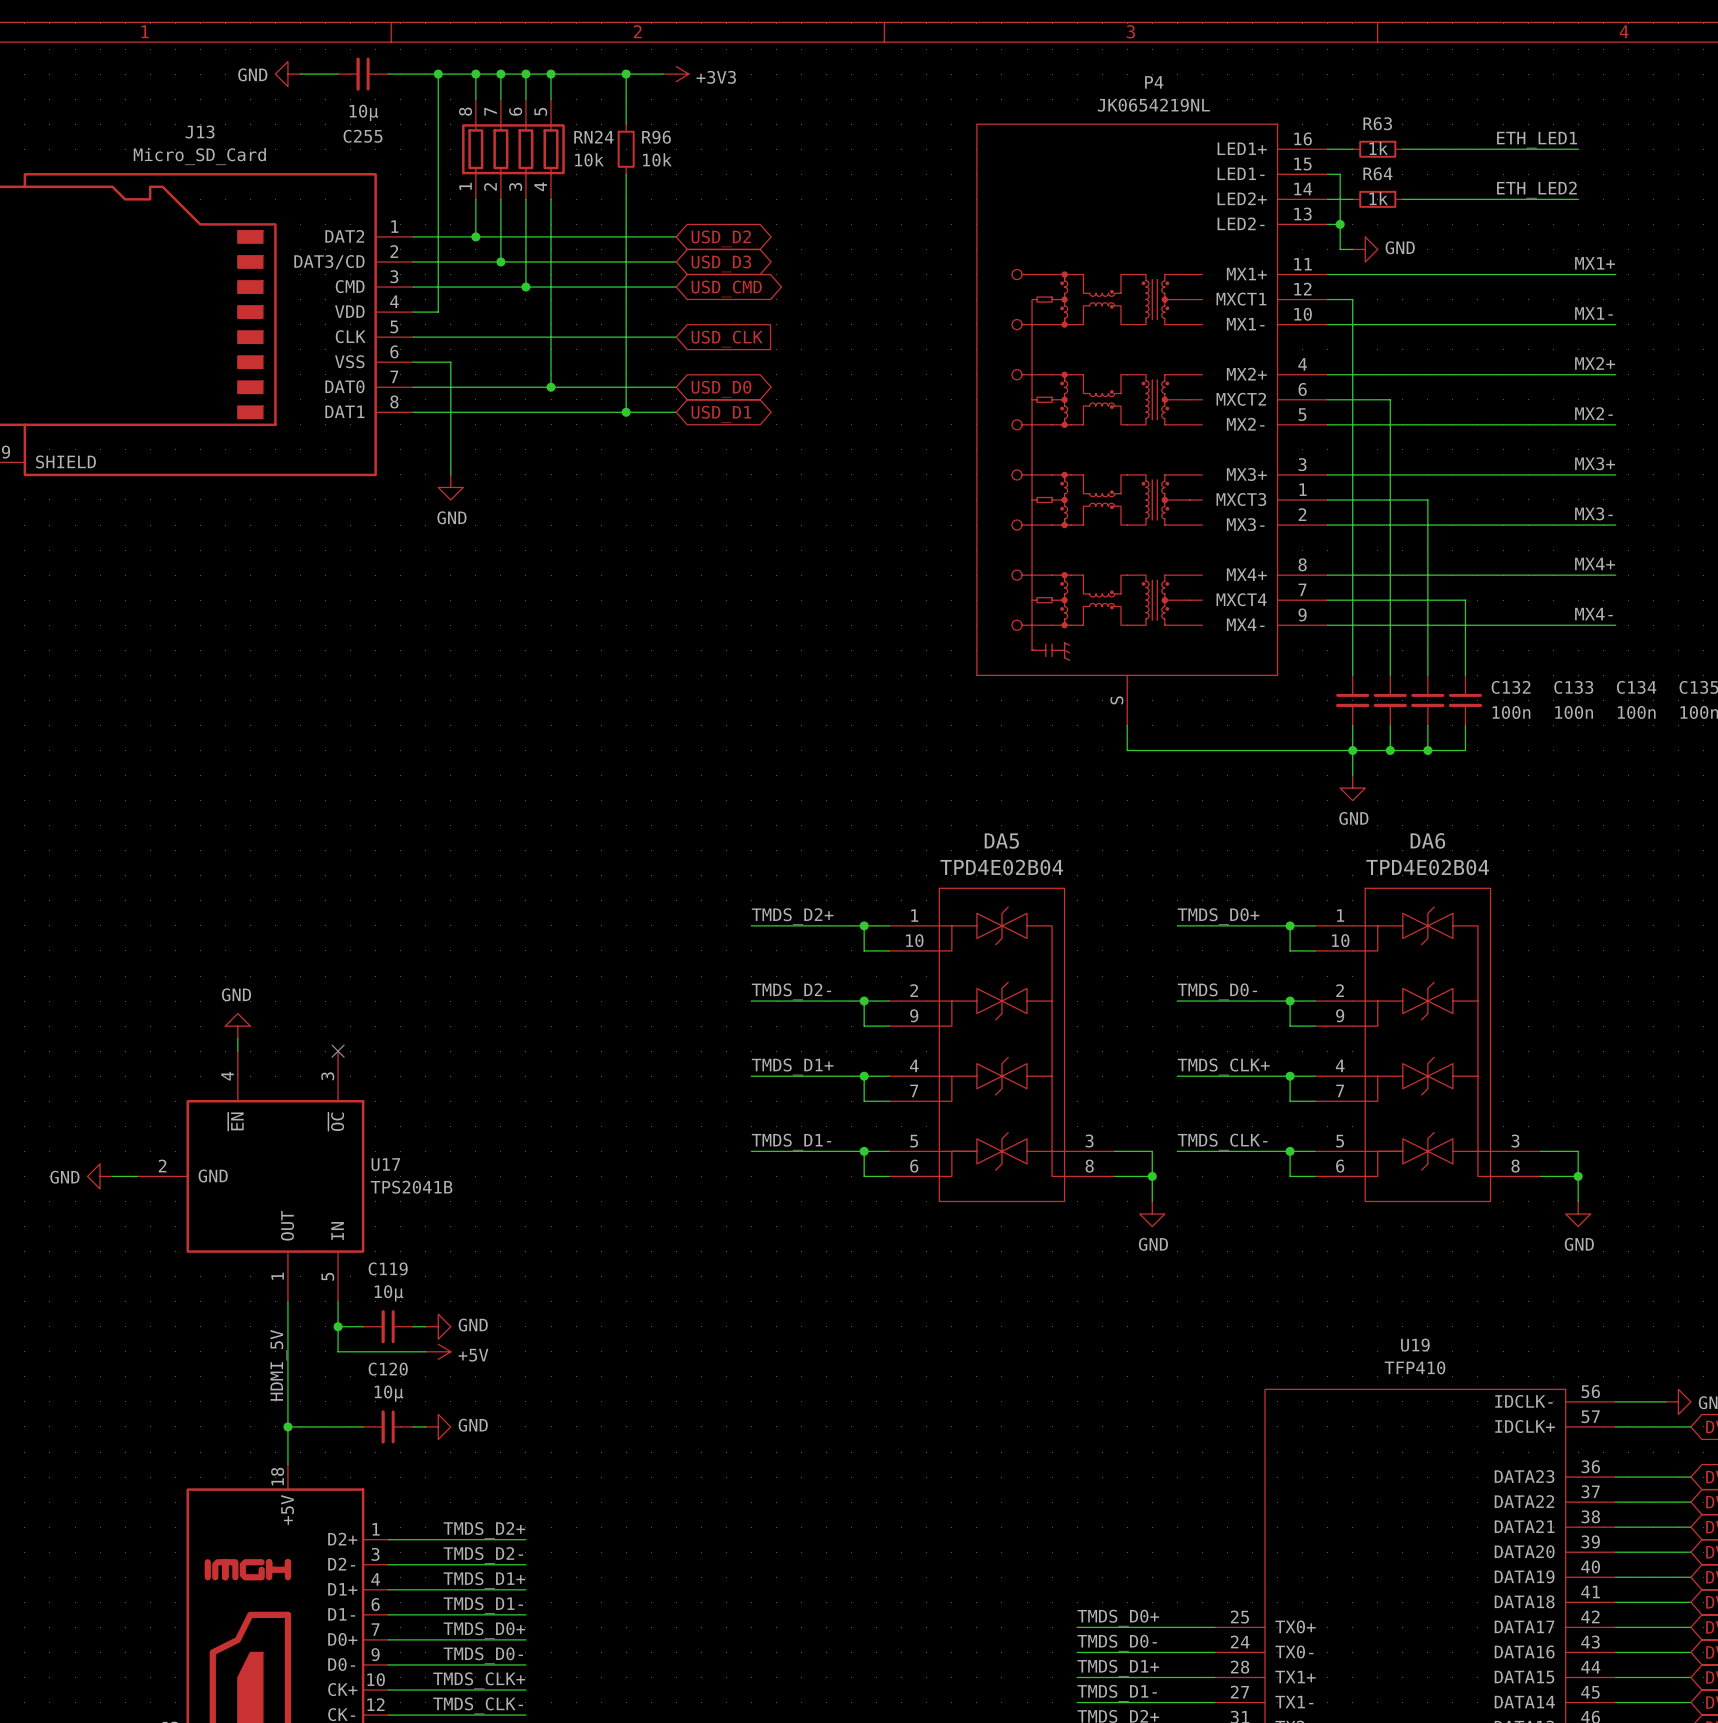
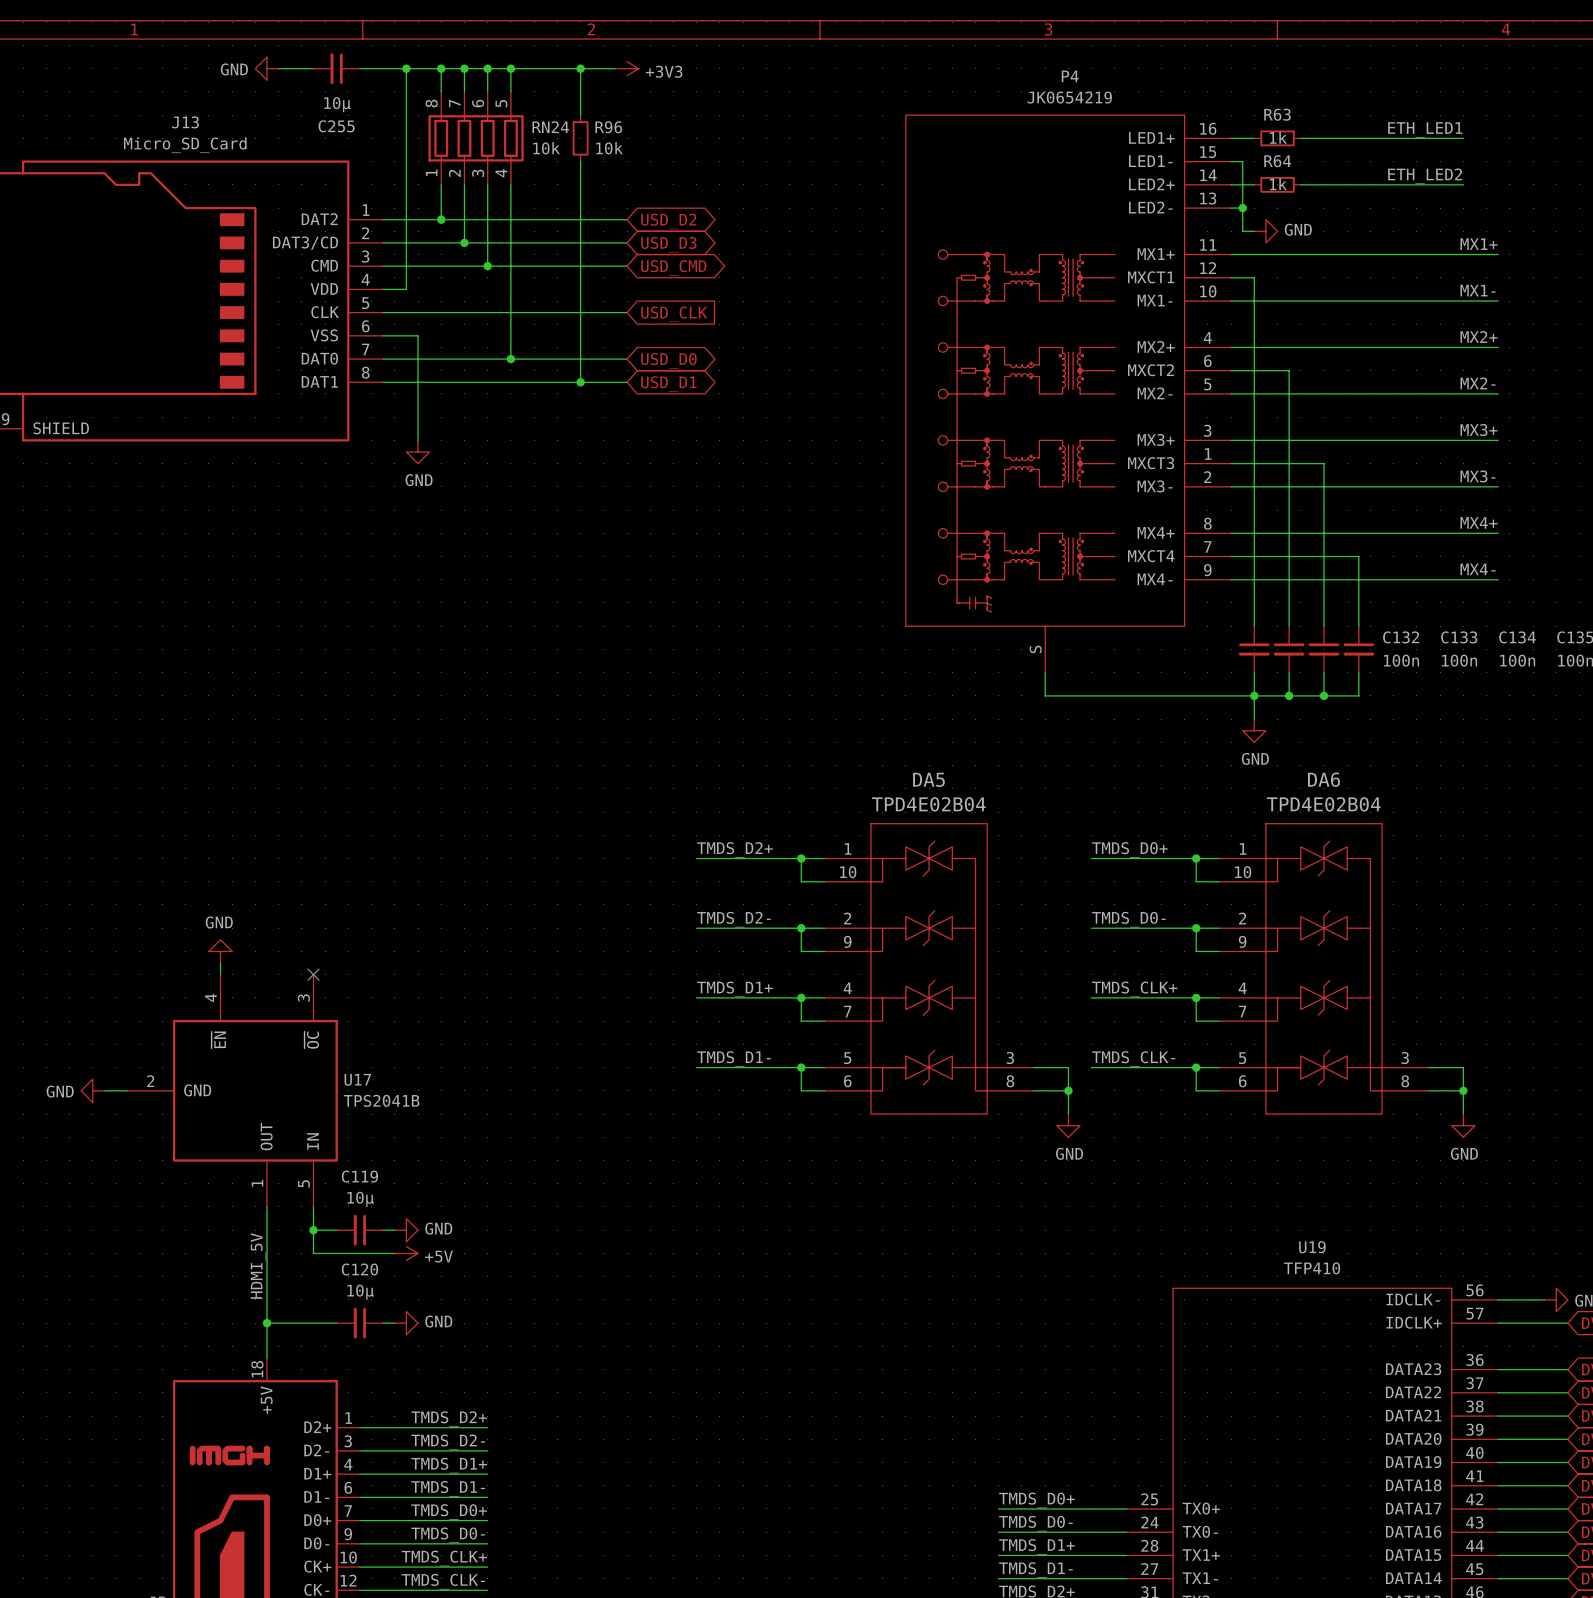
P4 value: JK0654219NL (1153, 105) -> JK0654219 (1069, 97)

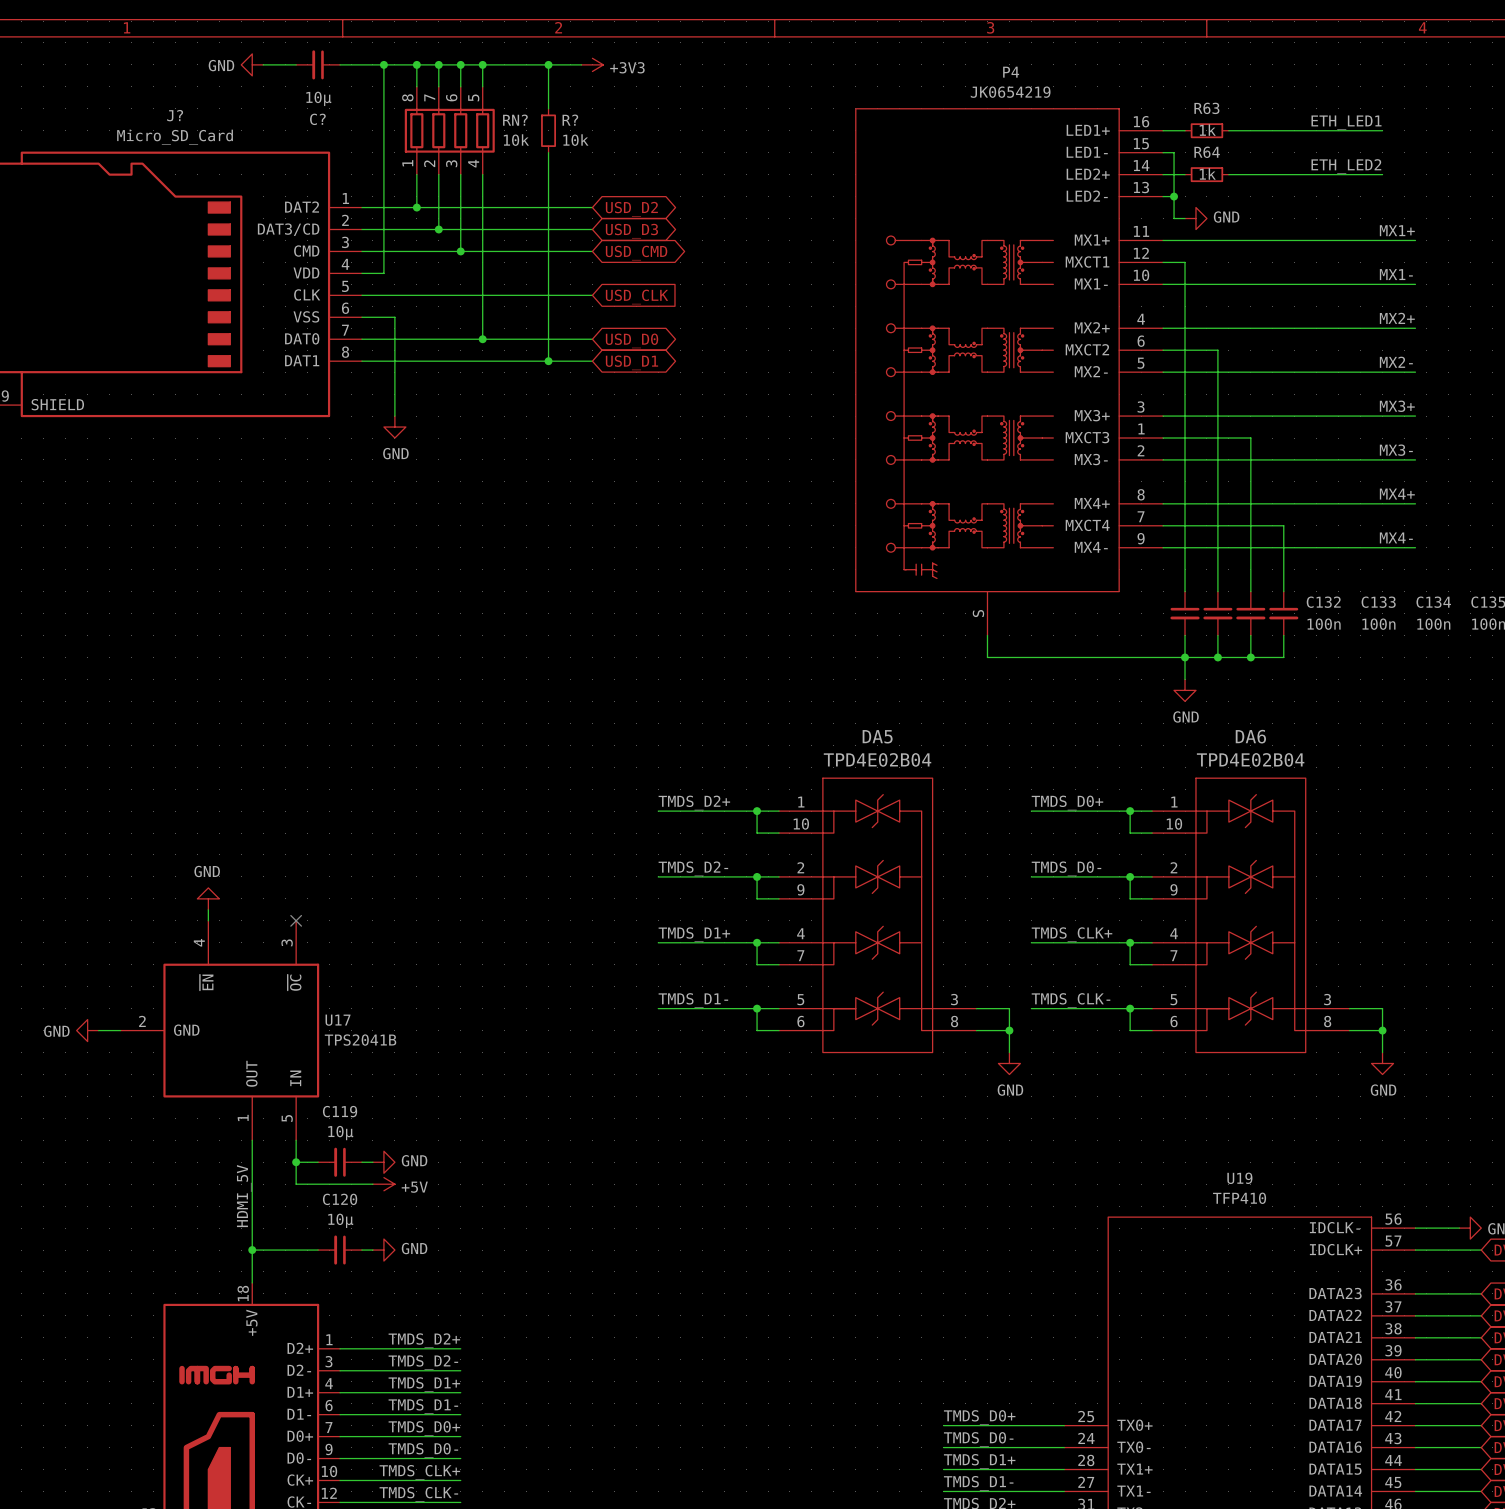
J13 name: J13 (185, 122) -> J? (175, 115)
C255 name: C255 (336, 126) -> C? (317, 119)
RN24 name: RN24 (550, 127) -> RN? (515, 120)
R96 name: R96 (608, 127) -> R? (570, 120)

